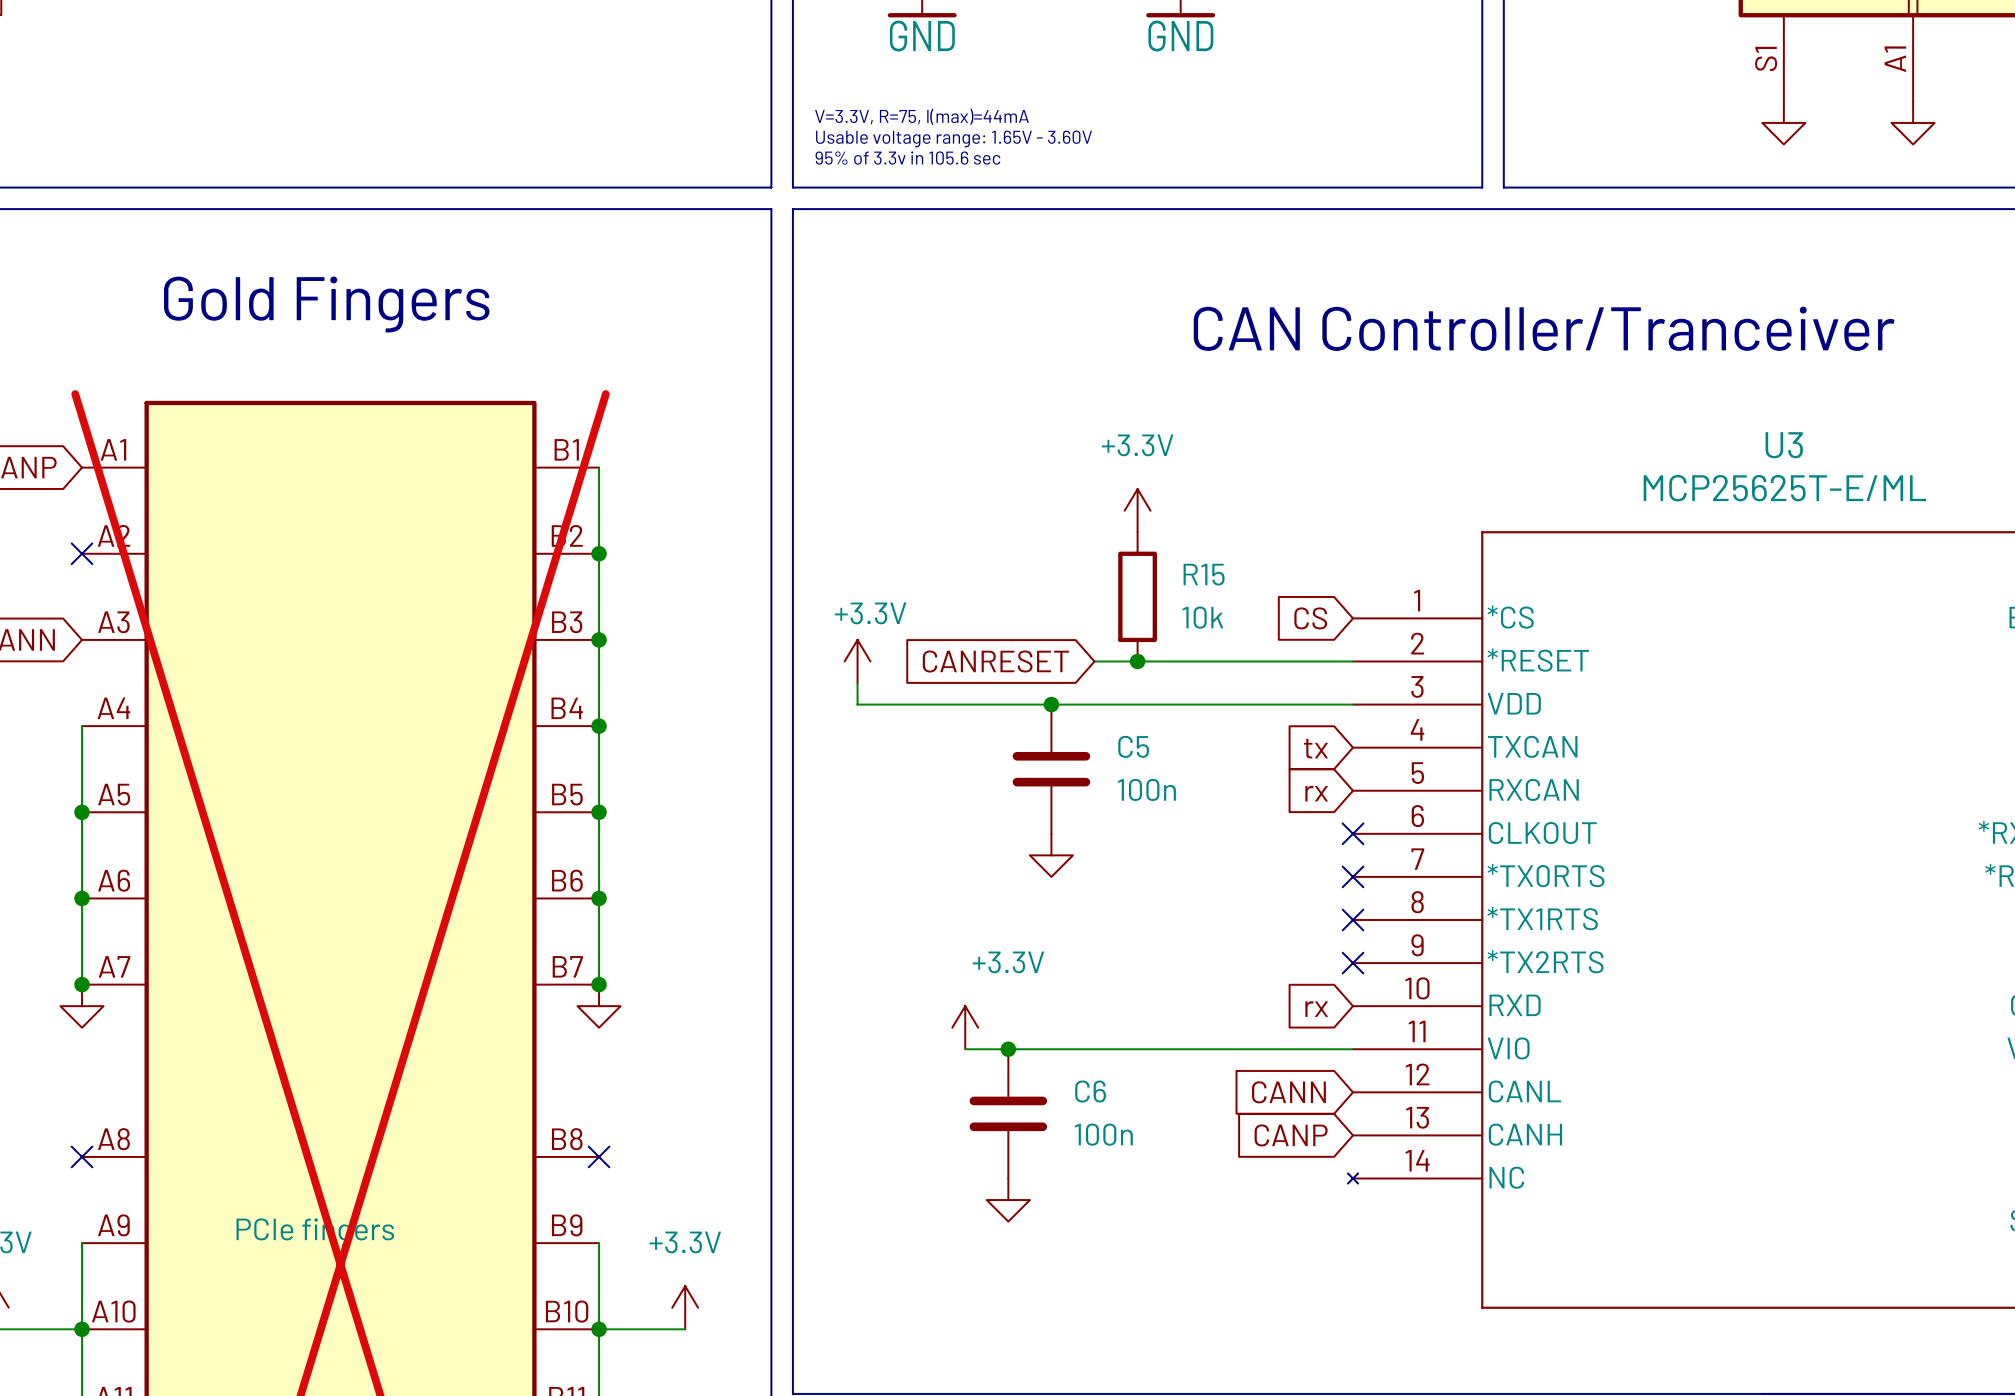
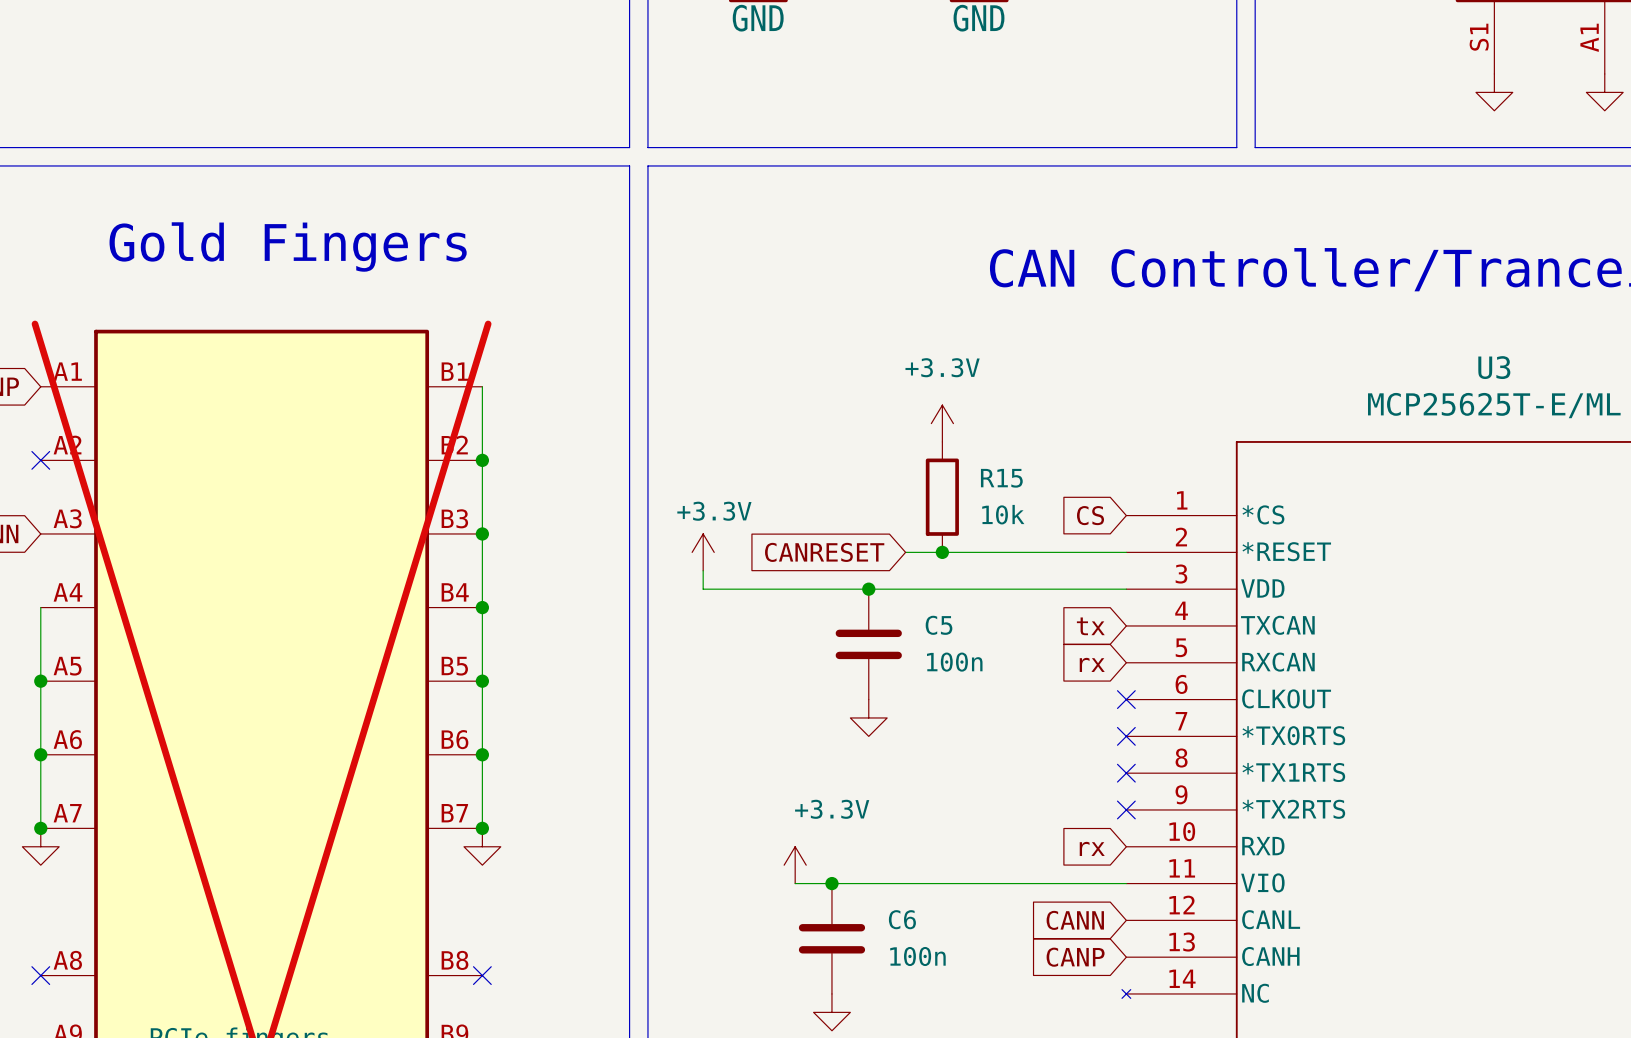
text: V=3.3V, R=75, I(max)=44mA (921, 116) -> none
text: Usable voltage range: 1.65V - 3.60V (954, 138) -> none
text: 95% of 3.3v in 105.6 sec (907, 158) -> none

